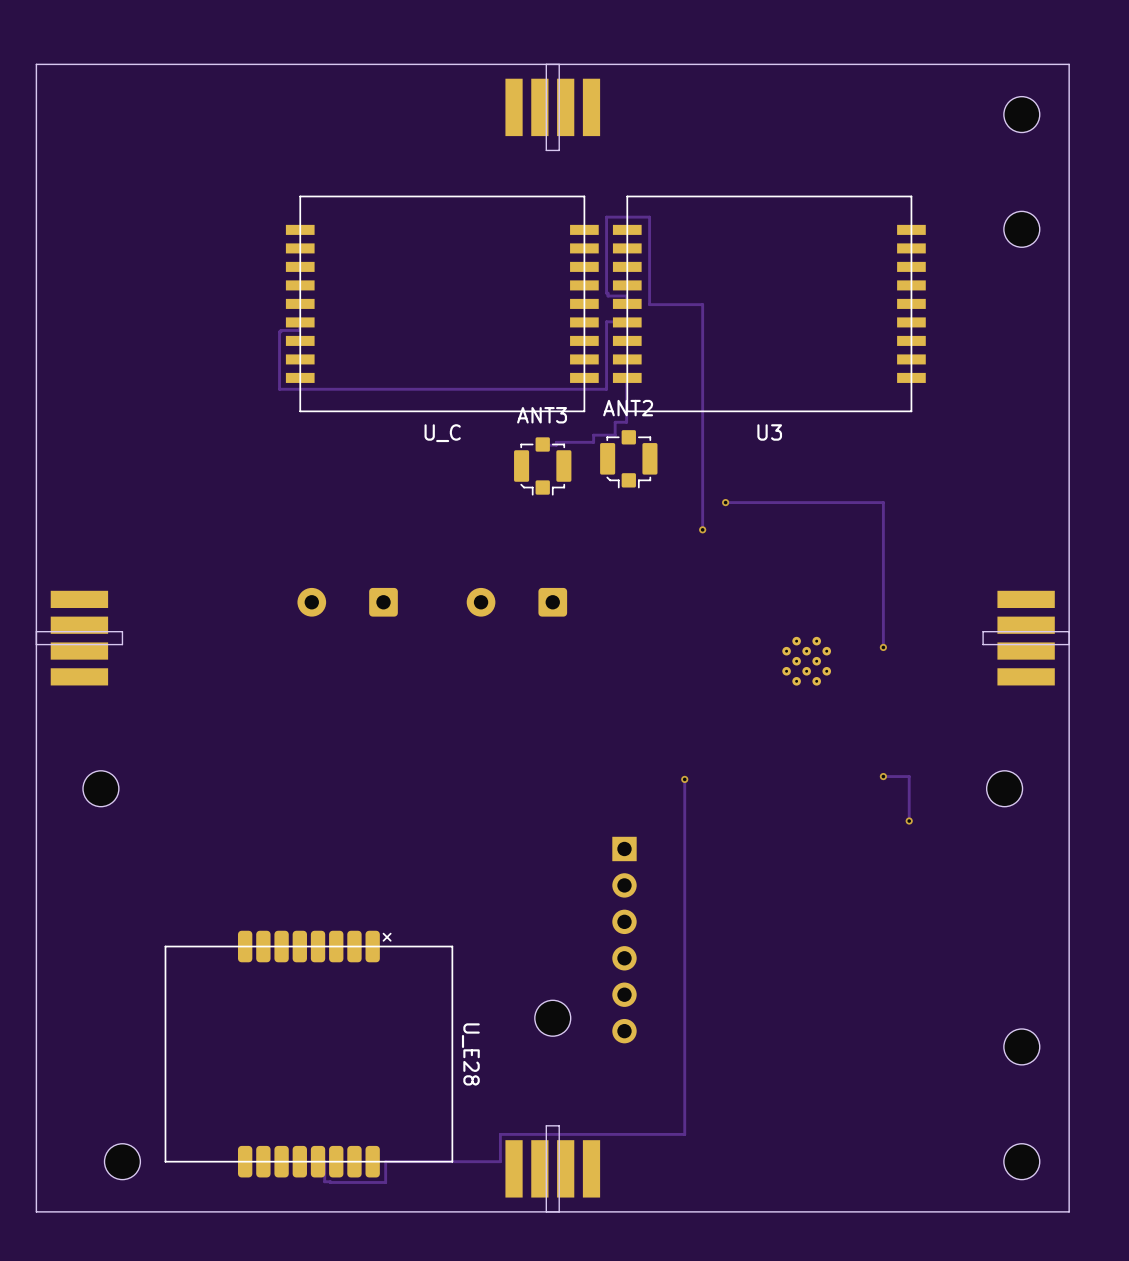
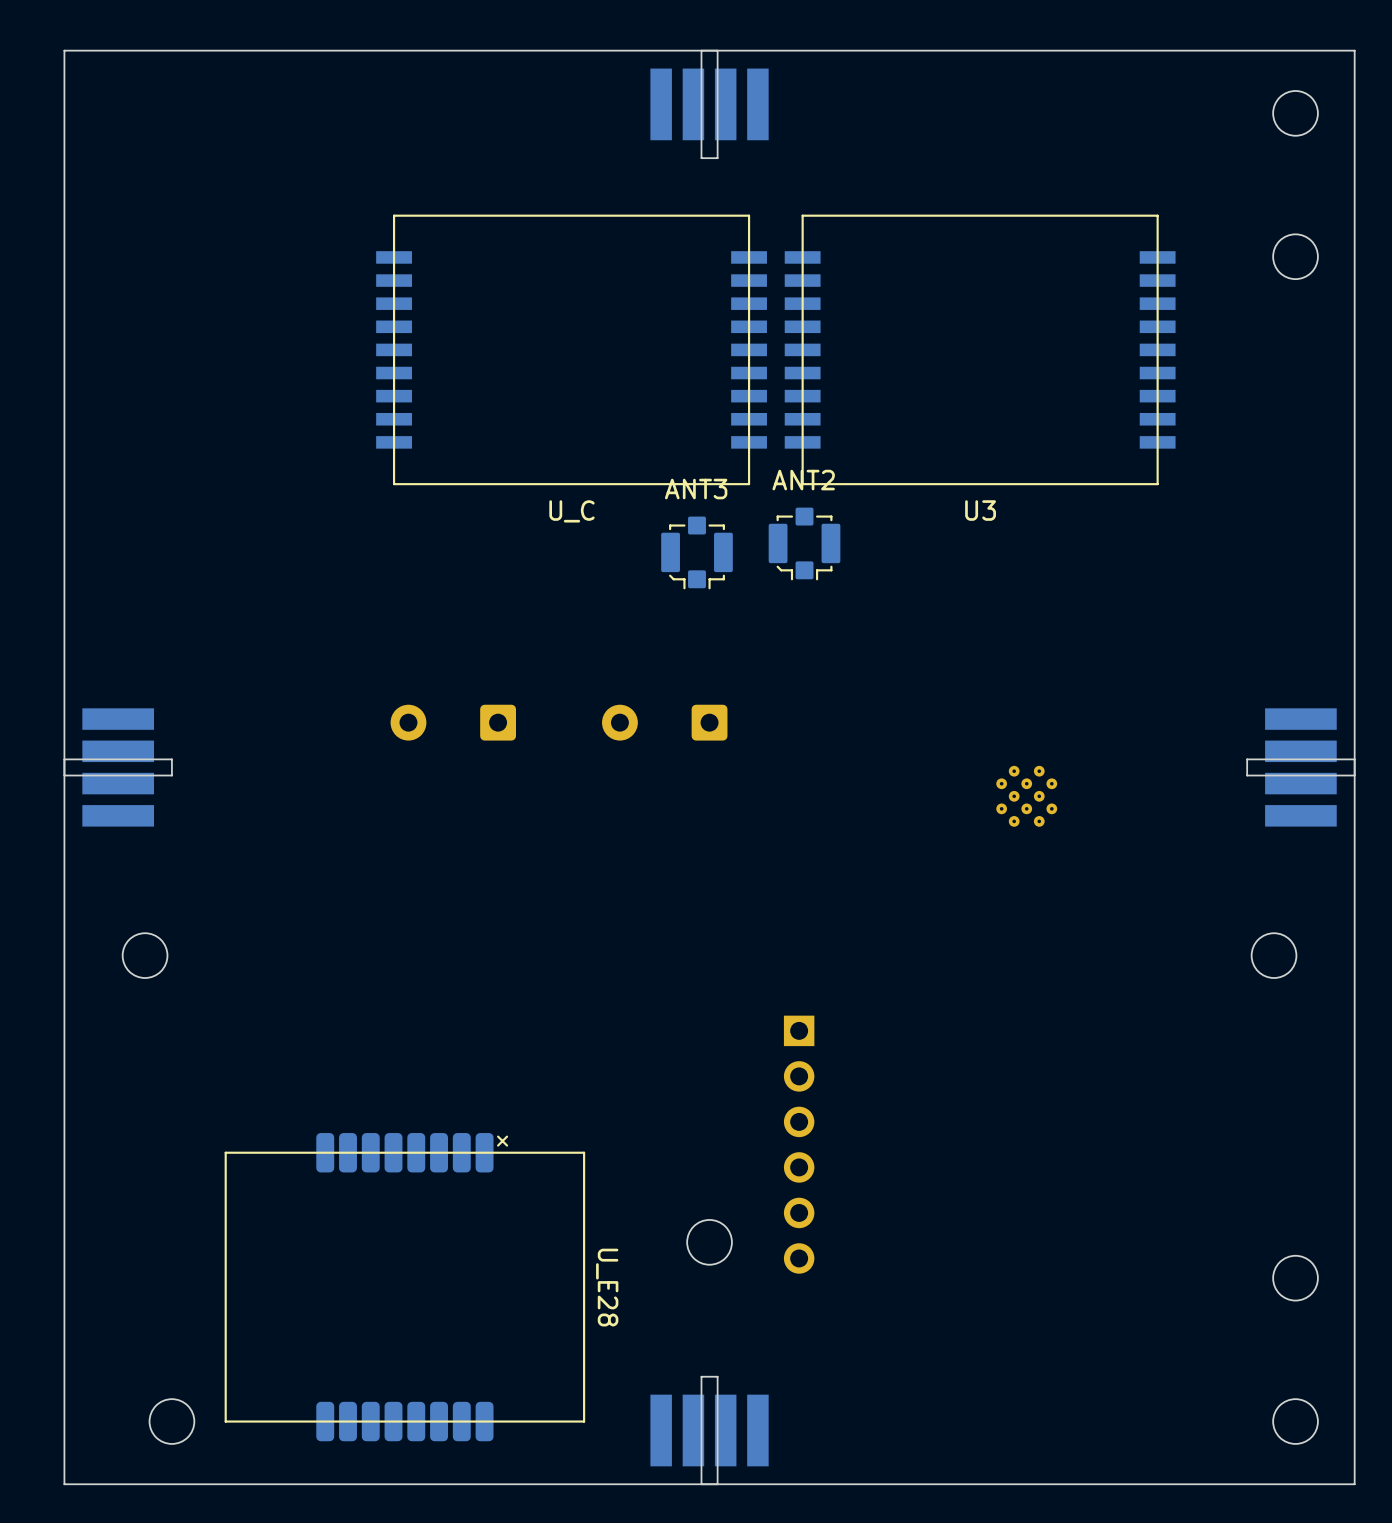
track: (626, 304) (626, 296) (607, 296) (606, 293) (606, 217) (649, 217) (649, 304) (702, 304) (702, 529) -> none
track: (626, 321) (606, 321) (606, 389) (279, 389) (279, 331) (299, 330) (299, 321) -> none
track: (626, 377) (626, 422) (615, 422) (615, 435) (593, 435) (593, 442) (556, 442) (556, 445) (542, 445) -> none
track: (725, 502) (883, 502) (883, 647) -> none
via: (725, 502) -> none
via: (702, 529) -> none
via: (883, 647) -> none
track: (883, 776) (909, 776) (909, 821) -> none
via: (883, 776) -> none
track: (684, 779) (684, 1134) (500, 1134) (500, 1161) (385, 1161) (385, 1182) (324, 1181) (324, 1161) (318, 1161) -> none
via: (684, 779) -> none
via: (909, 821) -> none

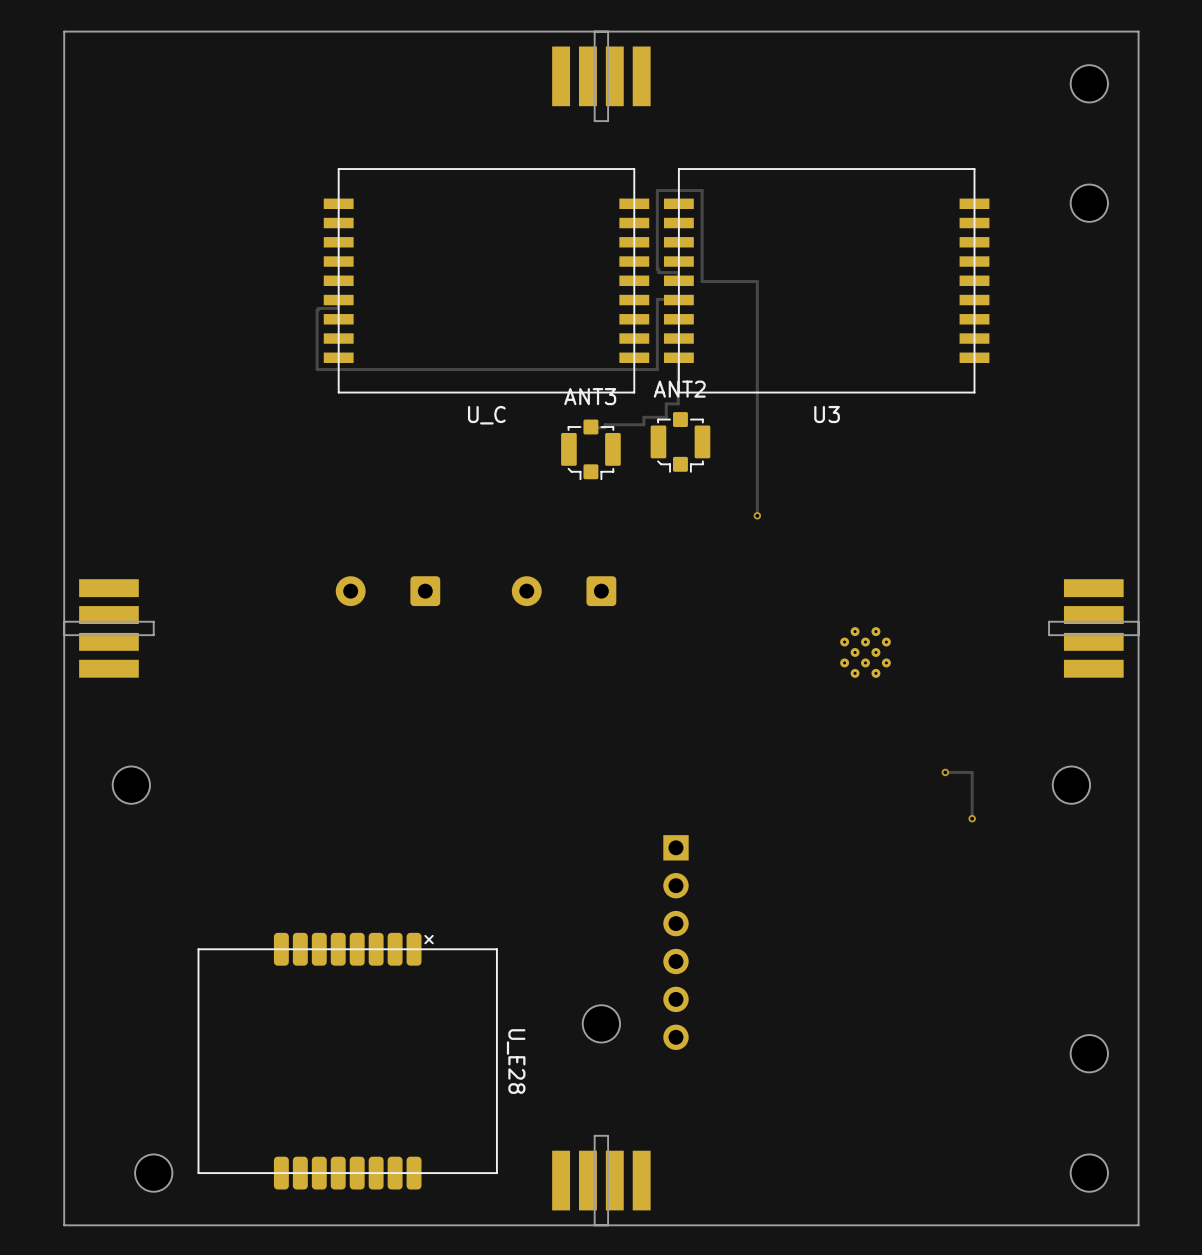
track: none -> (678, 281) (678, 272) (658, 272) (657, 269) (657, 190) (702, 190) (702, 281) (757, 281) (757, 515)
track: none -> (678, 299) (657, 299) (657, 369) (317, 369) (317, 309) (338, 308) (338, 299)
track: none -> (678, 357) (678, 403) (666, 403) (666, 417) (643, 417) (643, 424) (605, 424) (605, 427) (590, 427)
via: none -> (757, 515)
track: none -> (945, 772) (972, 772) (972, 818)
via: none -> (945, 772)
via: none -> (972, 818)

